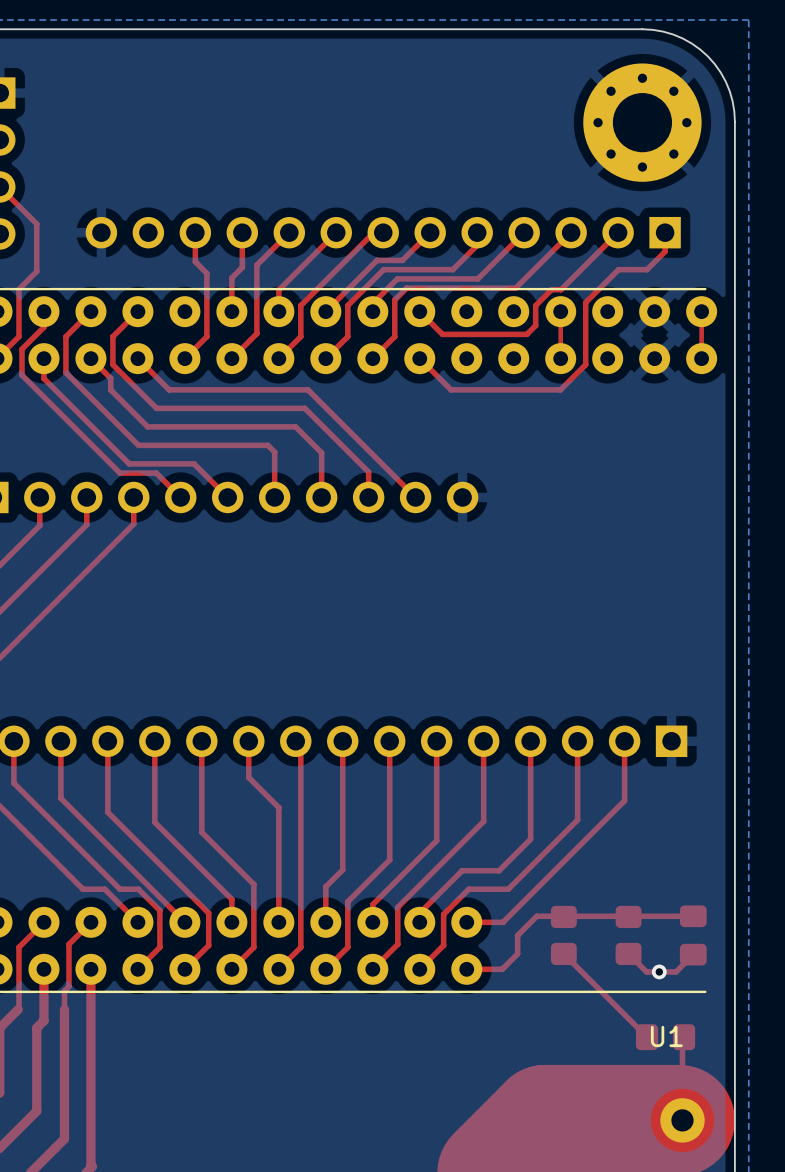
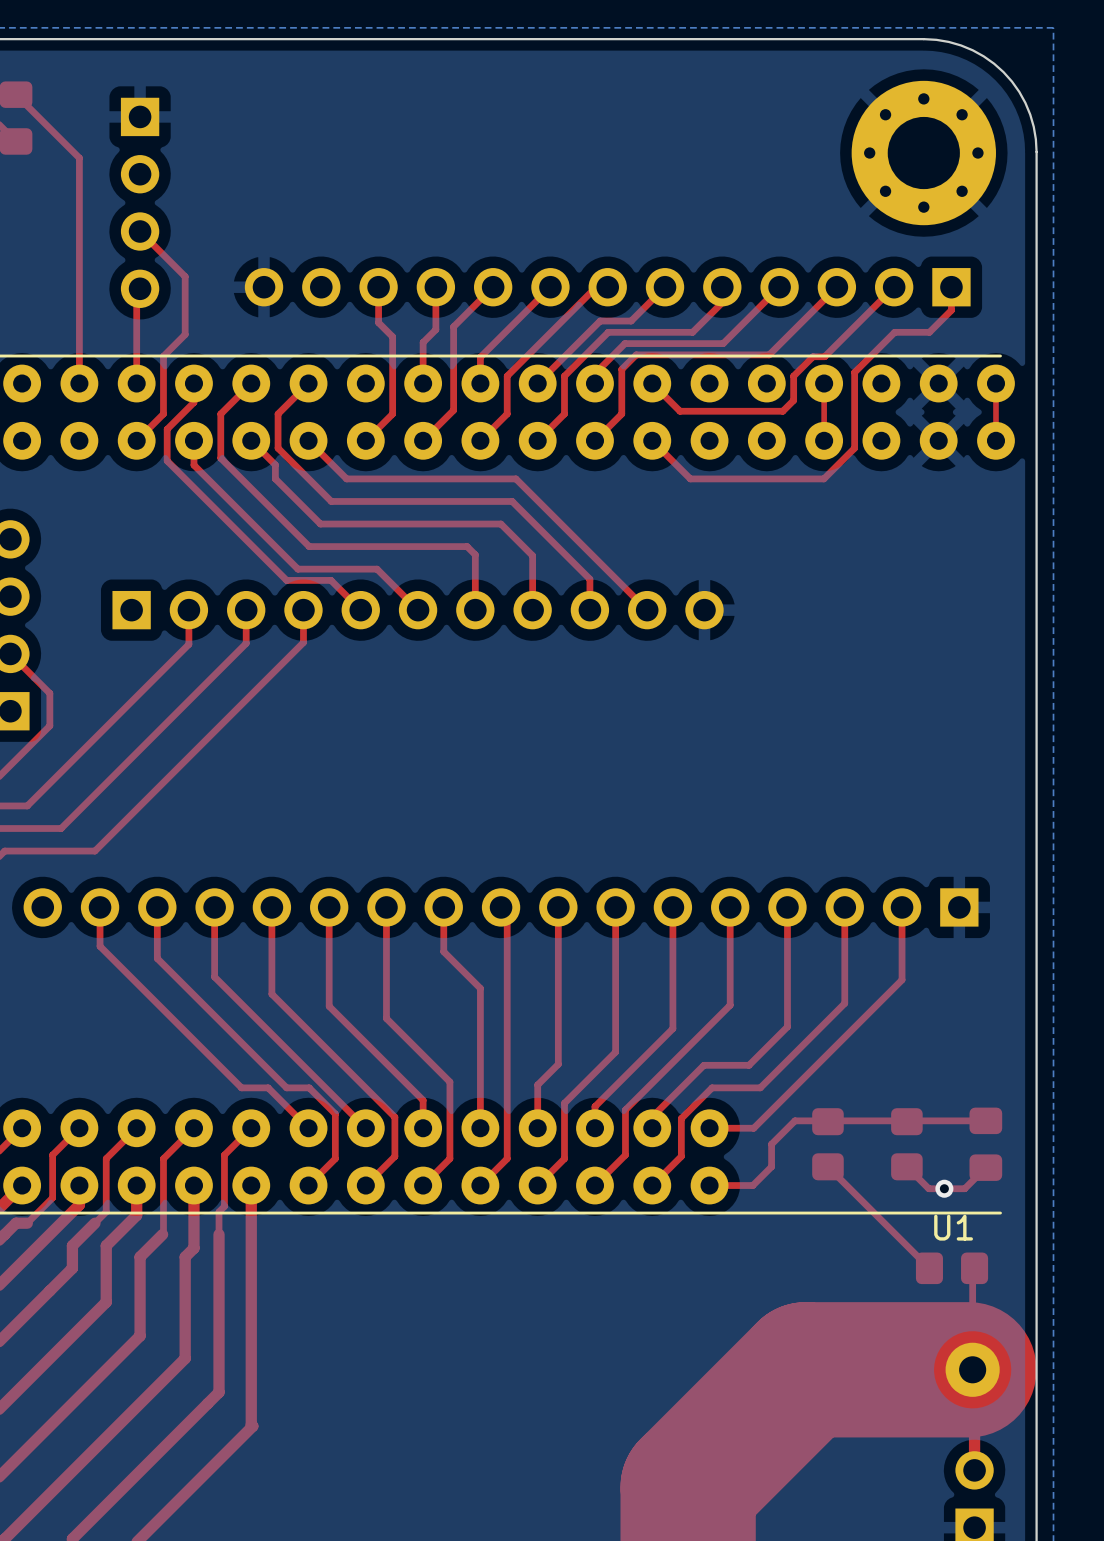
U1 name position: U1 (666, 1036) -> U1 (953, 1227)

